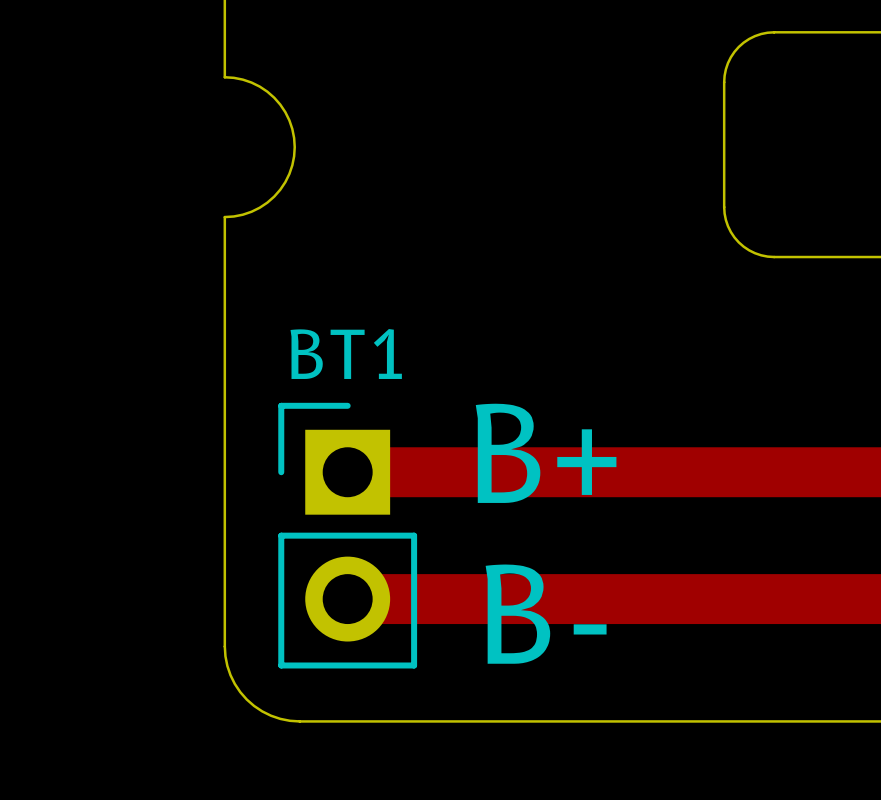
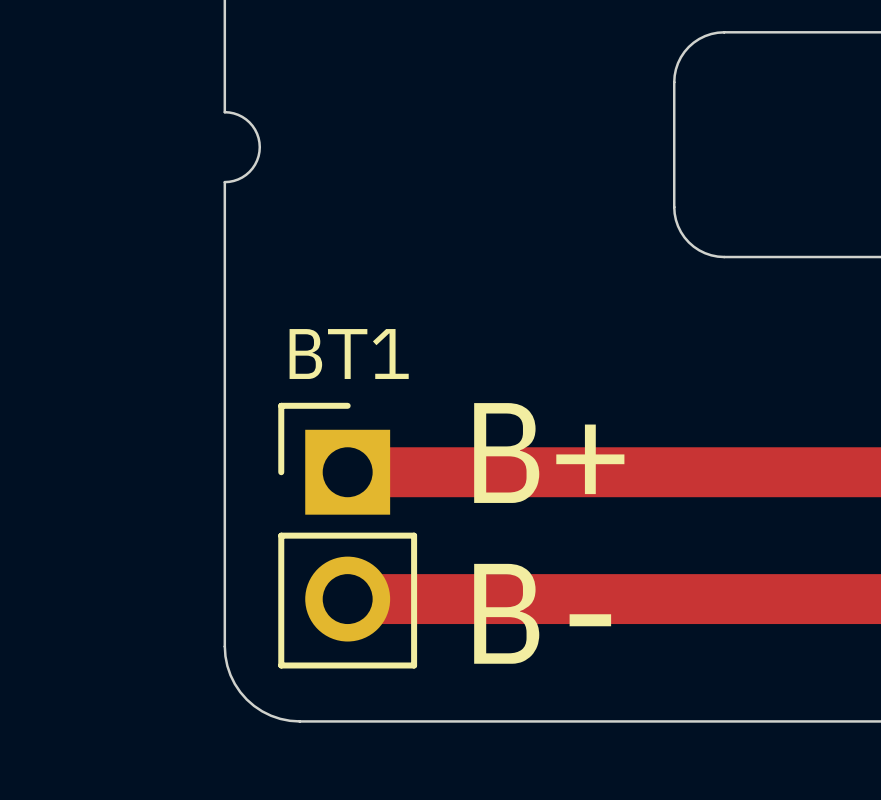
board edge: (774, 32) (755, 36) (738, 46) (727, 63) (724, 82) (724, 207) (725, 220) (734, 237) (743, 246) (761, 255) (774, 257) -> (774, 32) (717, 32) (699, 39) (688, 46) (680, 57) (675, 69) (674, 82) (674, 207) (675, 220) (680, 232) (693, 246) (711, 255) (774, 257)
board edge: (224, 77) (251, 82) (274, 97) (289, 120) (294, 147) (289, 173) (274, 196) (251, 211) (224, 217) -> (224, 77) (224, 112) (238, 114) (249, 122) (257, 133) (259, 147) (257, 160) (249, 171) (238, 179) (224, 182) (224, 217)

